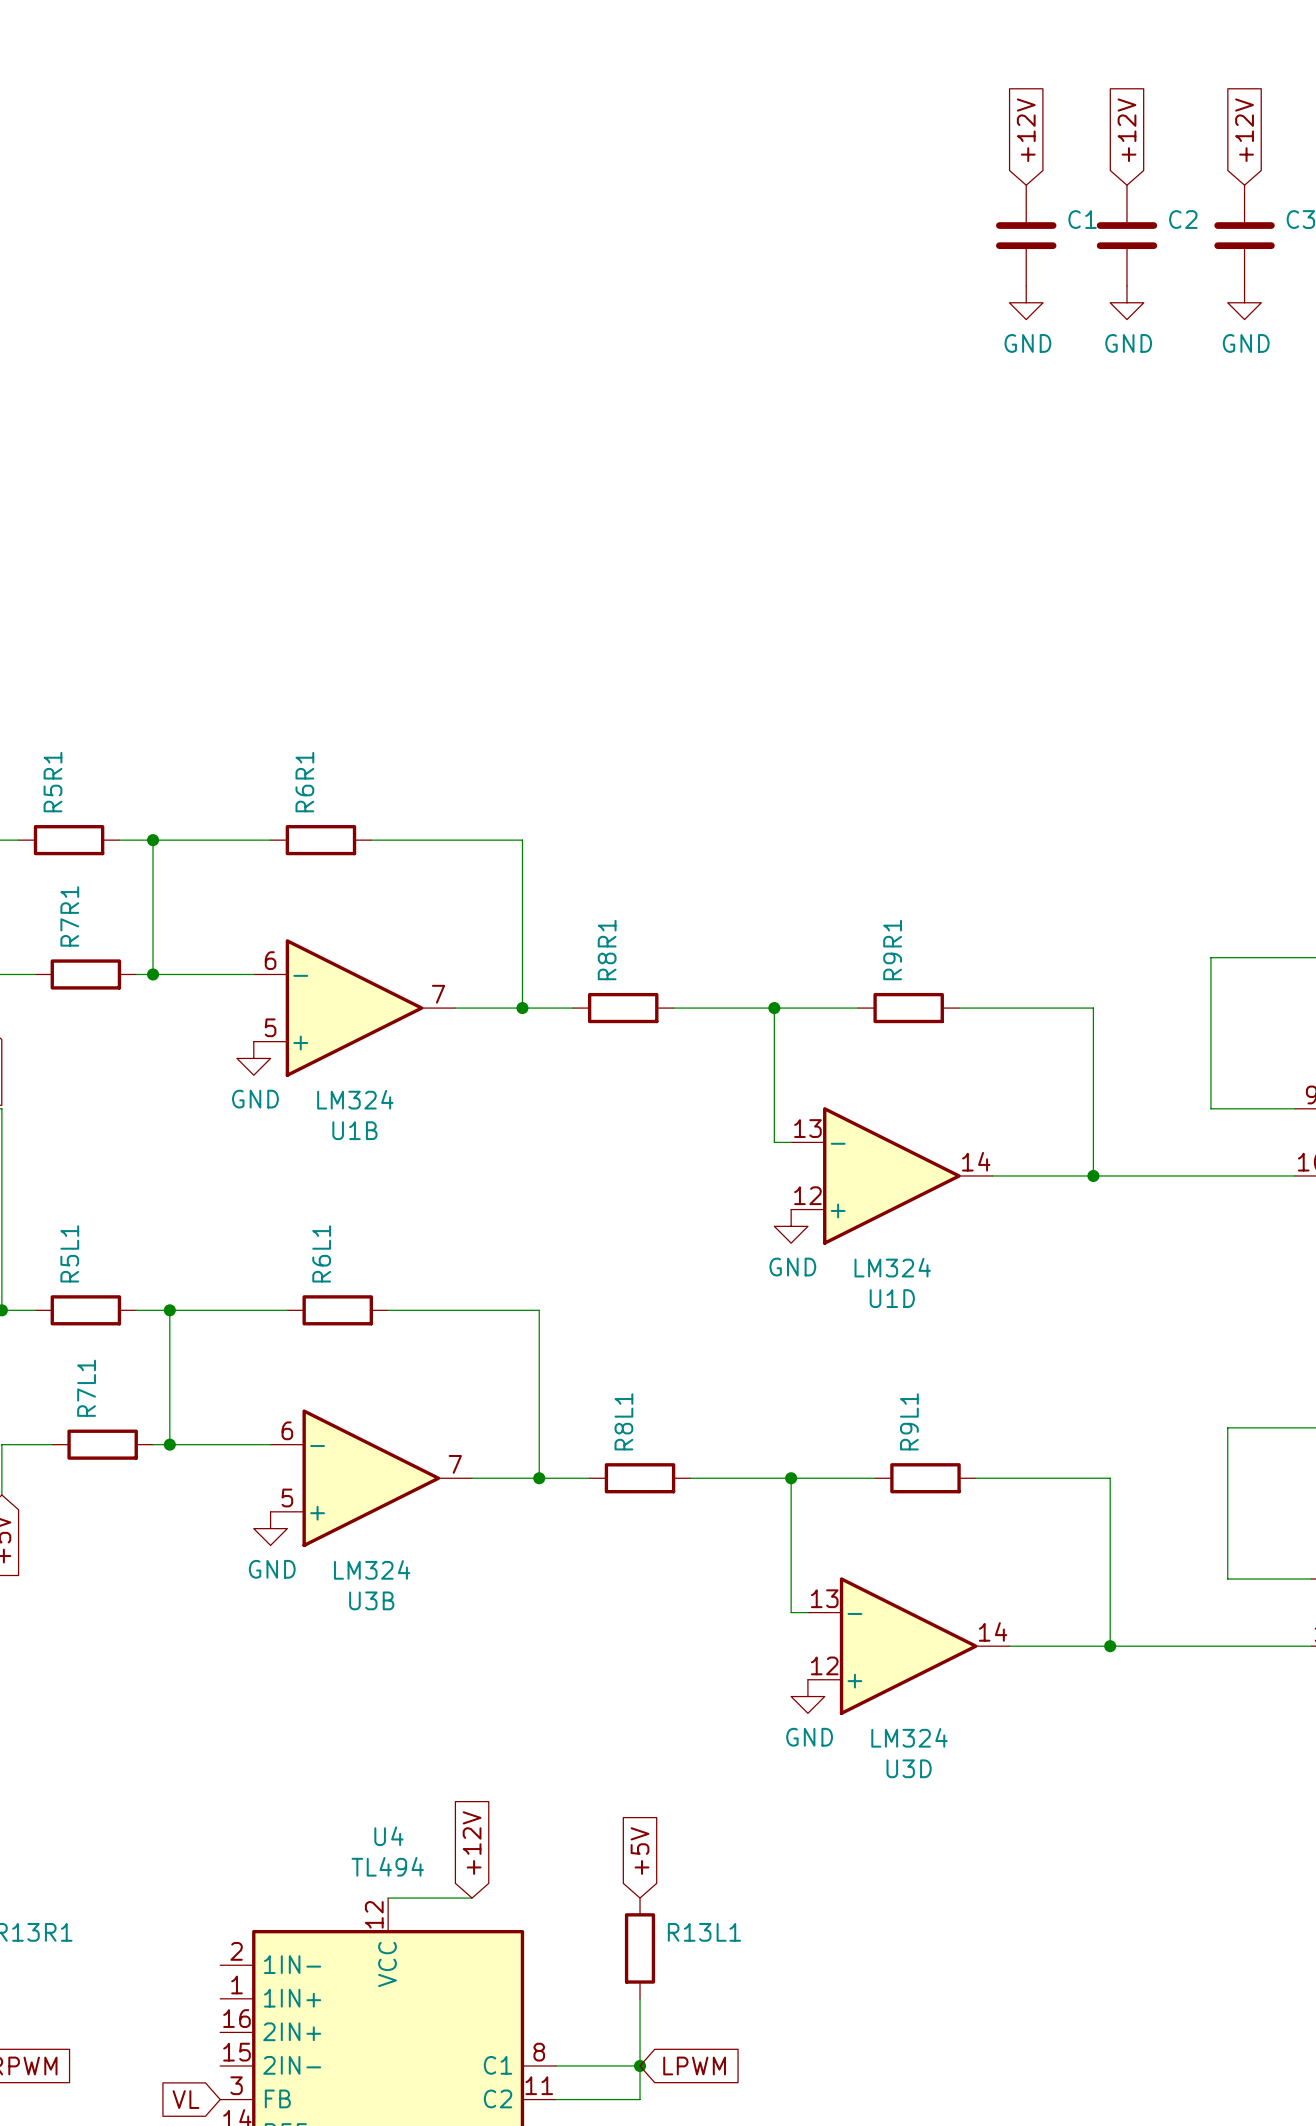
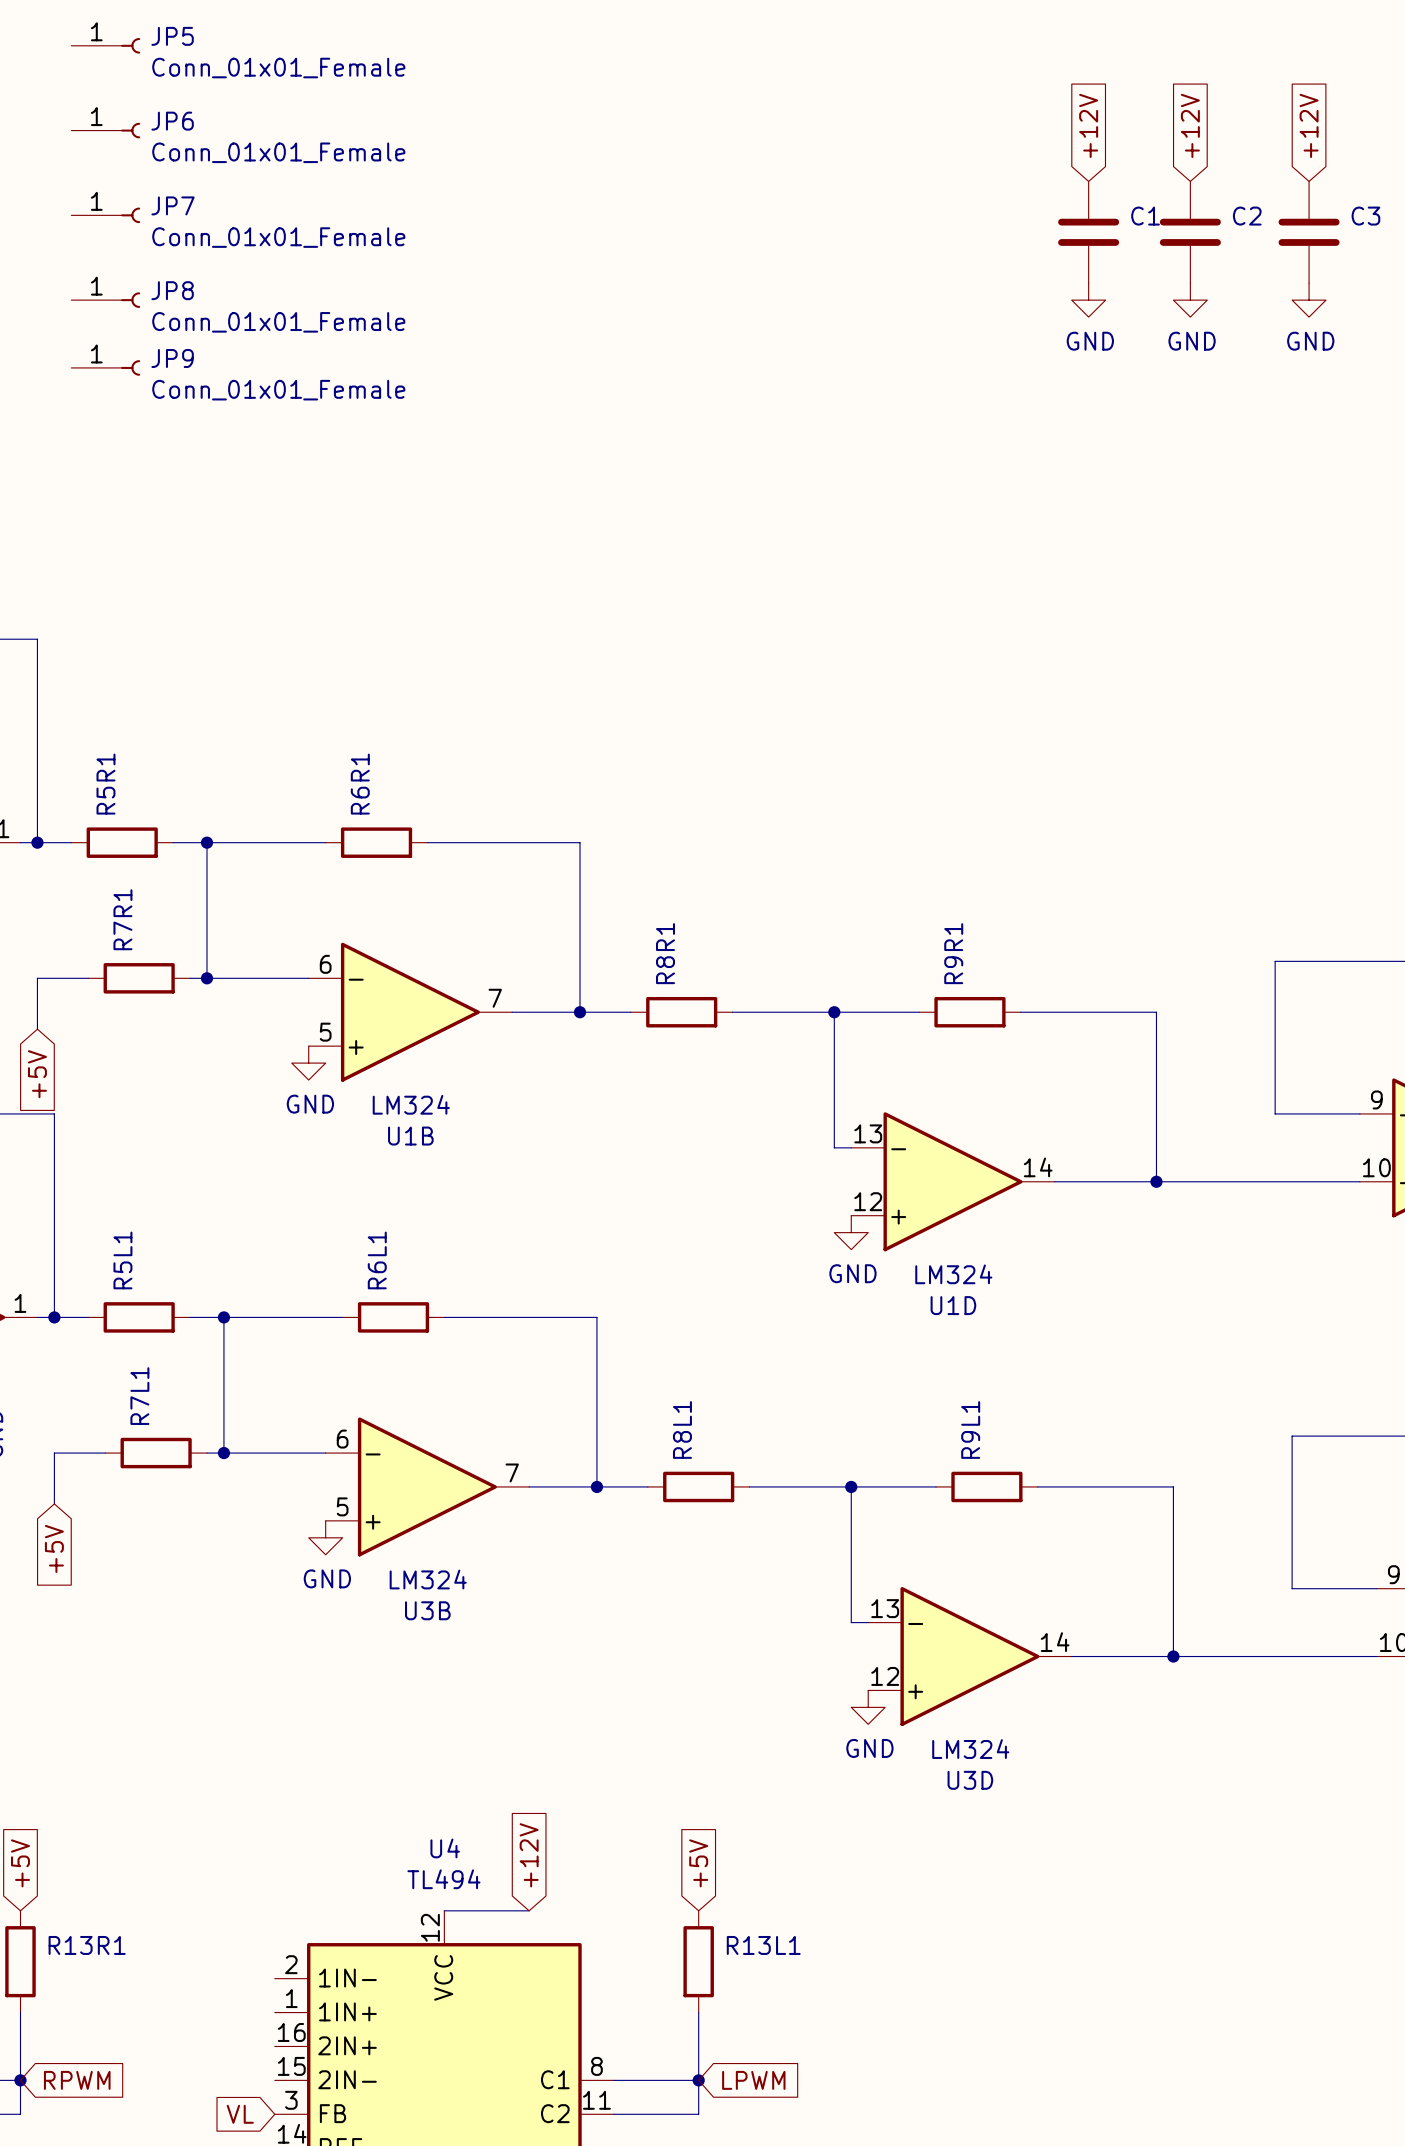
JP5: none -> Conn_01x01_Female (105, 45)
JP6: none -> Conn_01x01_Female (105, 130)
JP7: none -> Conn_01x01_Female (105, 215)
JP8: none -> Conn_01x01_Female (105, 300)
JP9: none -> Conn_01x01_Female (105, 367)

